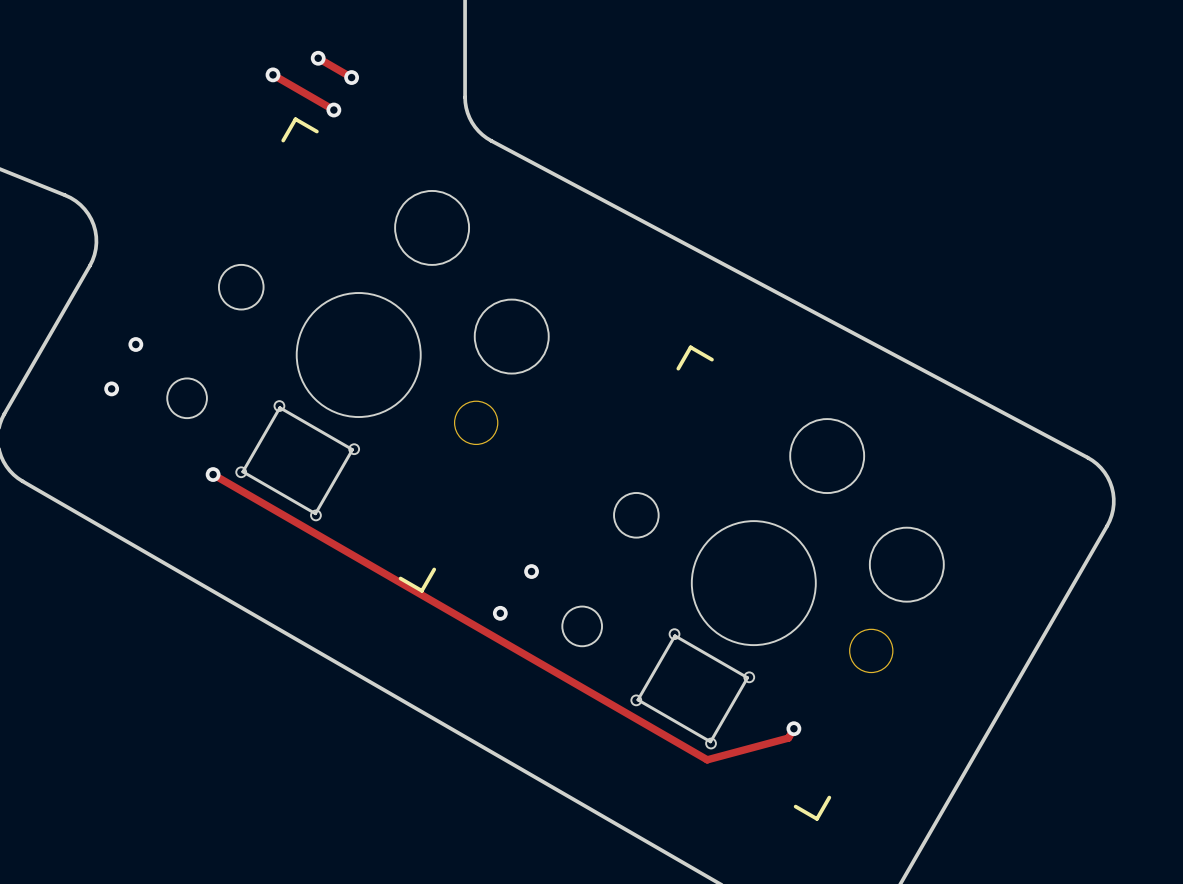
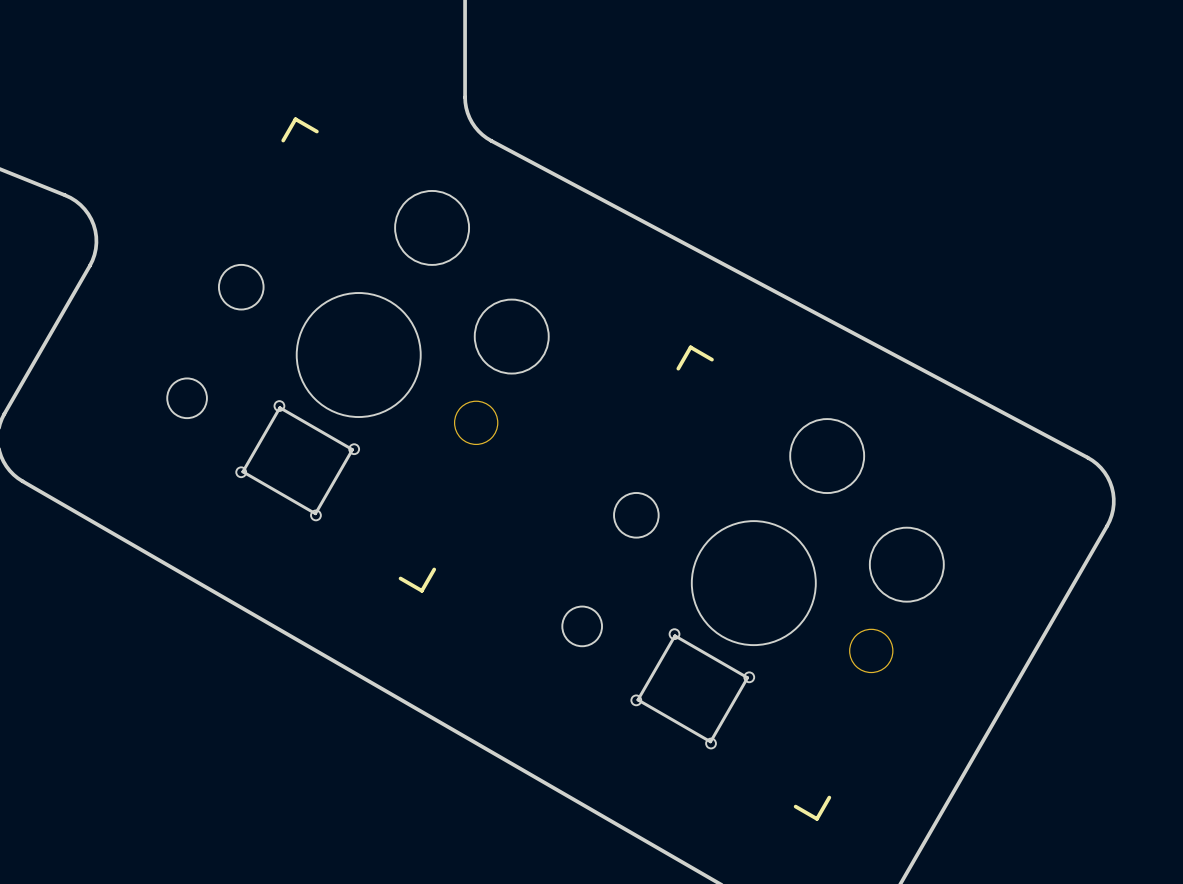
track: (318, 58) (351, 77) -> none
via: (318, 58) -> none
track: (273, 74) (333, 110) -> none
via: (273, 74) -> none
via: (351, 77) -> none
via: (333, 110) -> none
via: (135, 344) -> none
via: (111, 388) -> none
track: (213, 474) (707, 759) (788, 738) (793, 728) -> none
via: (213, 474) -> none
via: (531, 571) -> none
via: (500, 613) -> none
via: (793, 728) -> none

